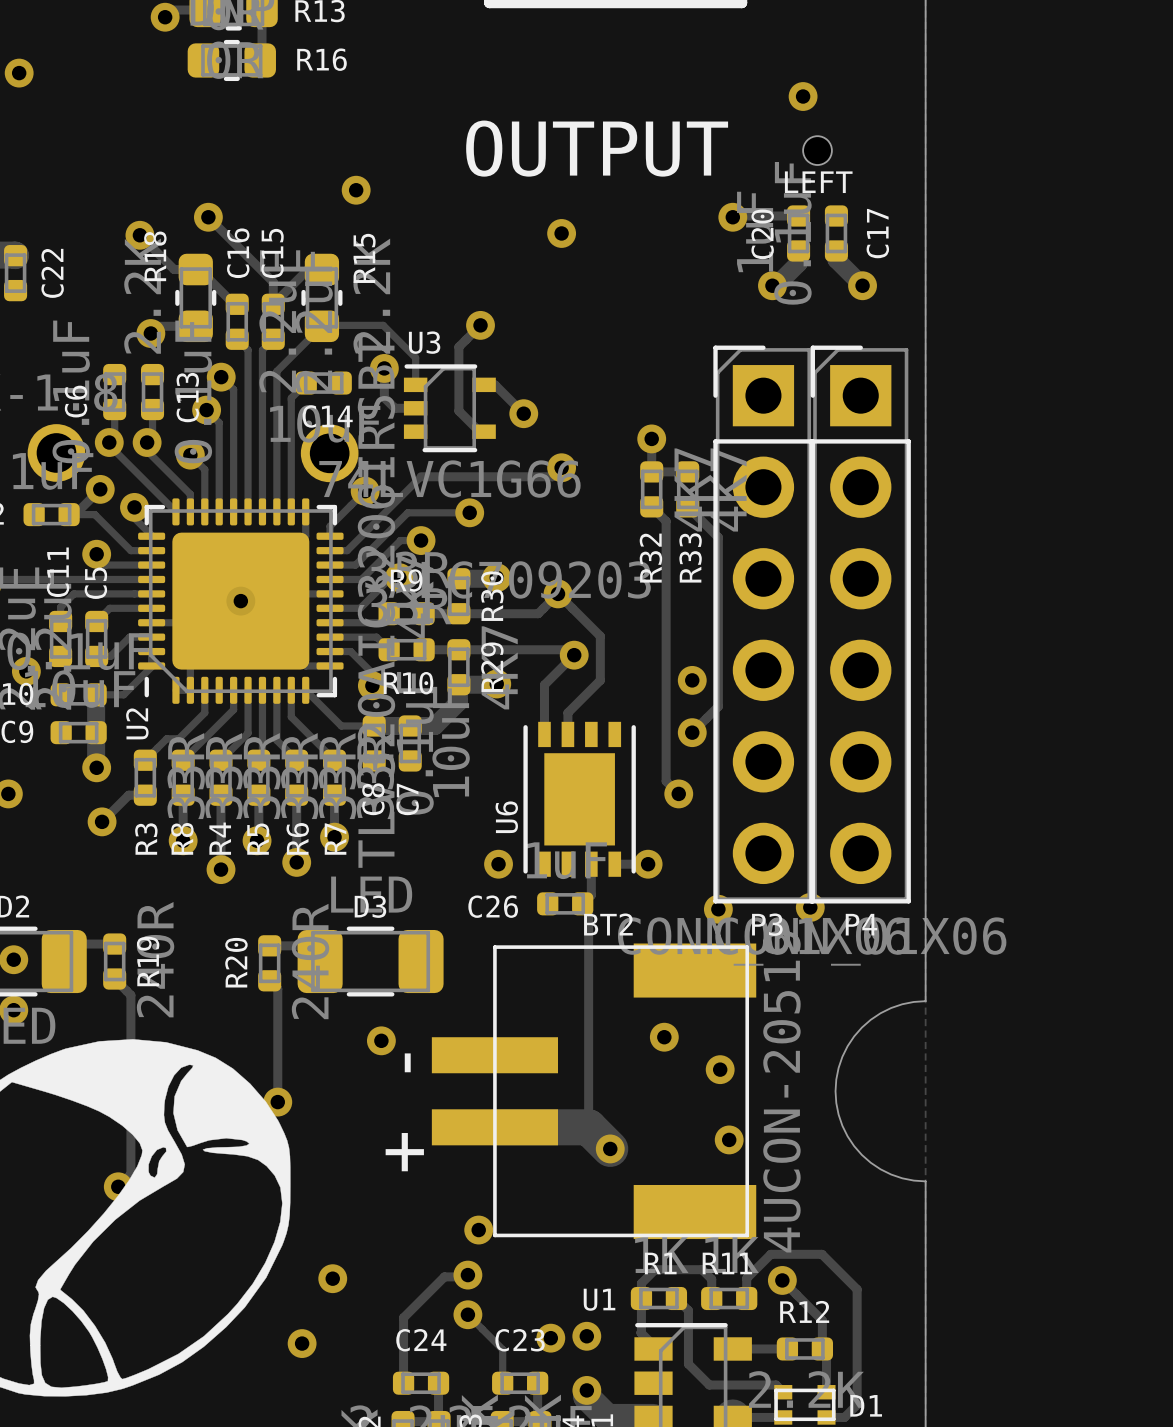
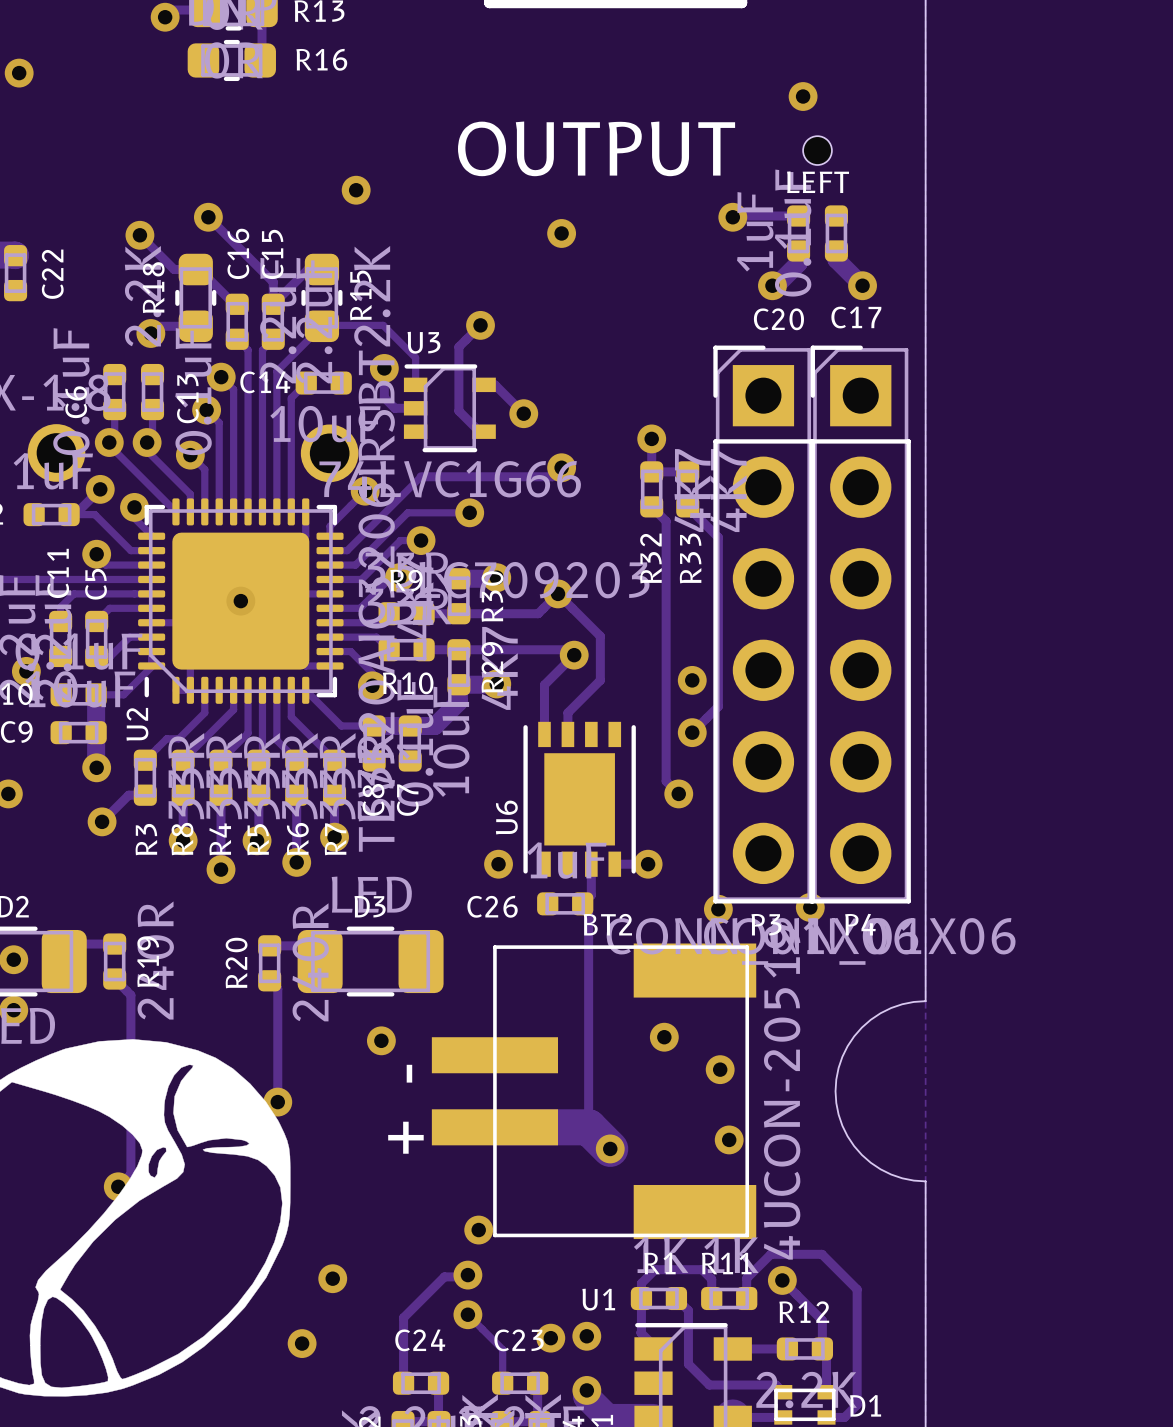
C17 name rotation: 0° (877, 233) -> 90° clockwise (856, 317)
C17 name position: C17 (877, 233) -> C17 (856, 317)
C20 name rotation: 0° (762, 234) -> 90° clockwise (778, 319)
C20 name position: C20 (762, 234) -> C20 (778, 319)
R18 name position: R18 (155, 256) -> R18 (153, 287)
R15 name position: R15 (364, 258) -> R15 (360, 295)
C14 name position: C14 (327, 416) -> C14 (265, 382)

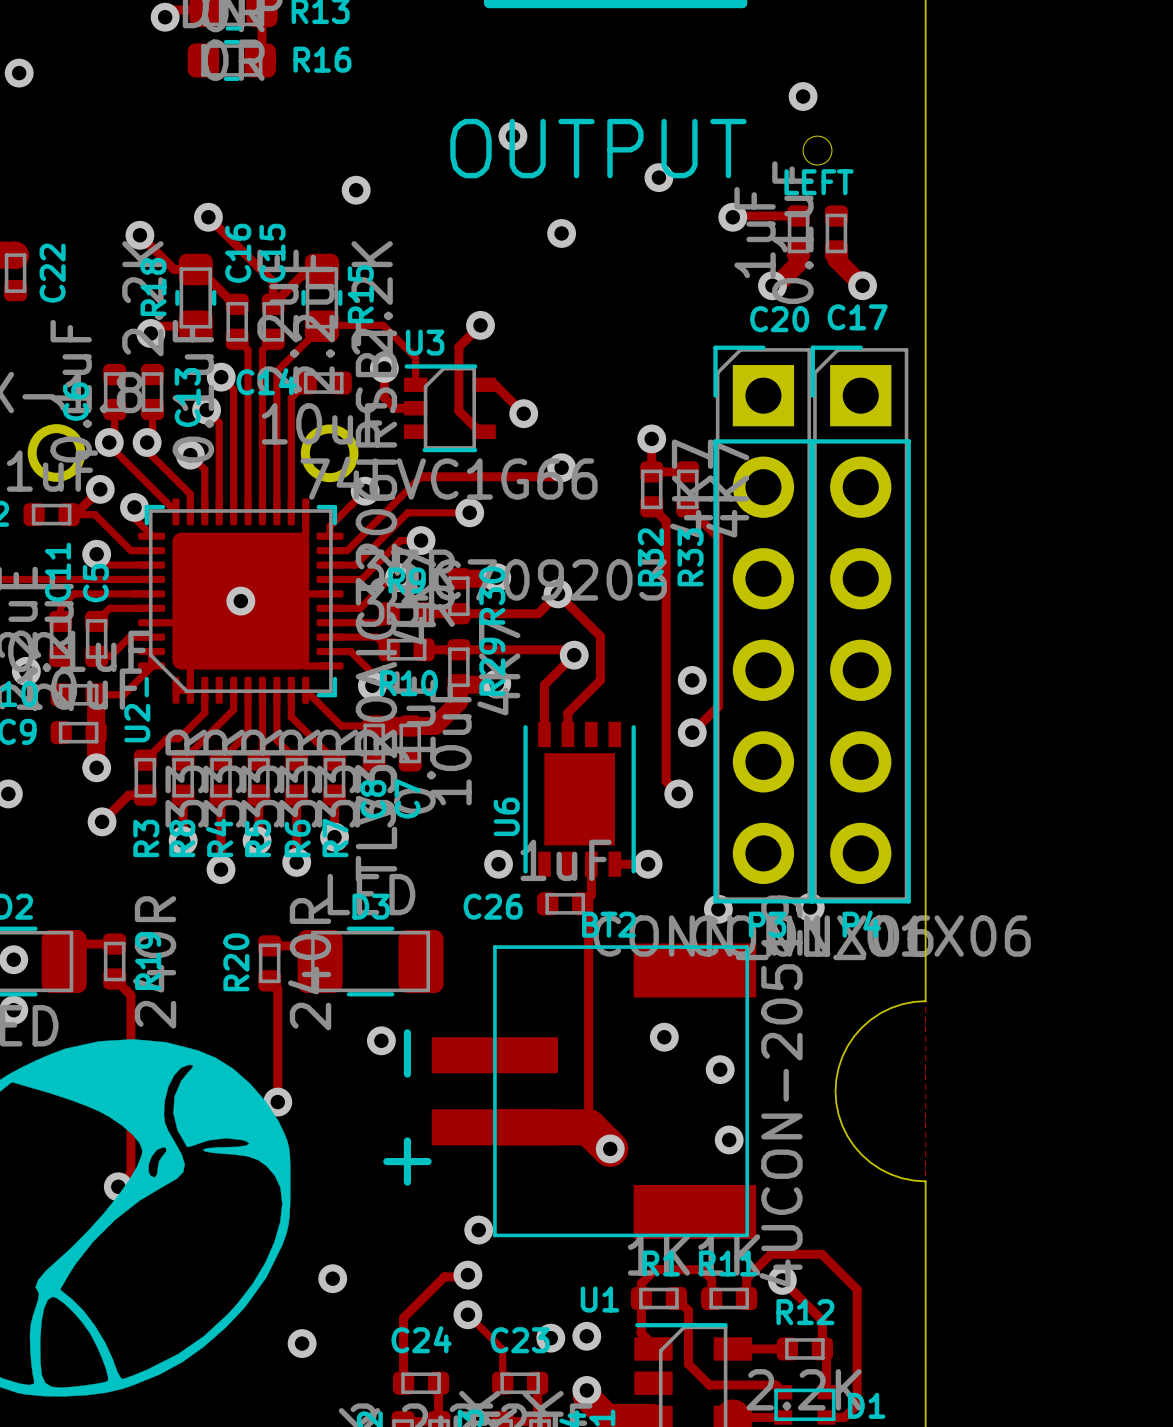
via: none -> (512, 136)
via: none -> (658, 177)

